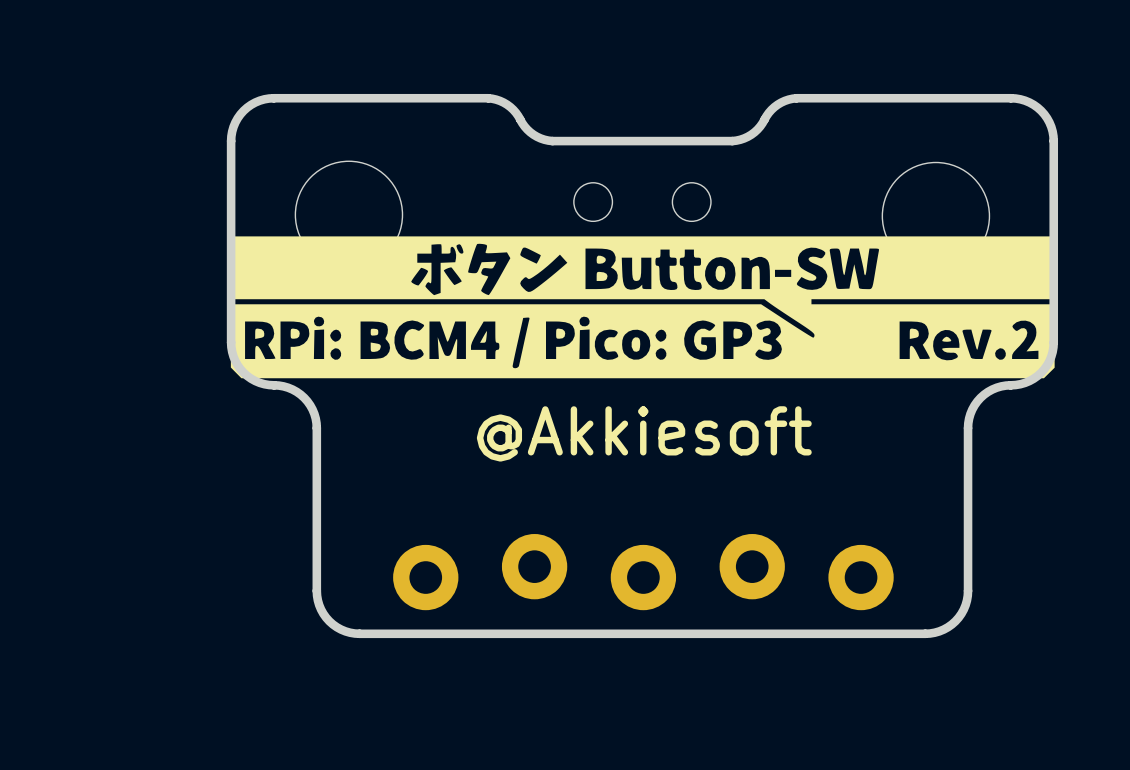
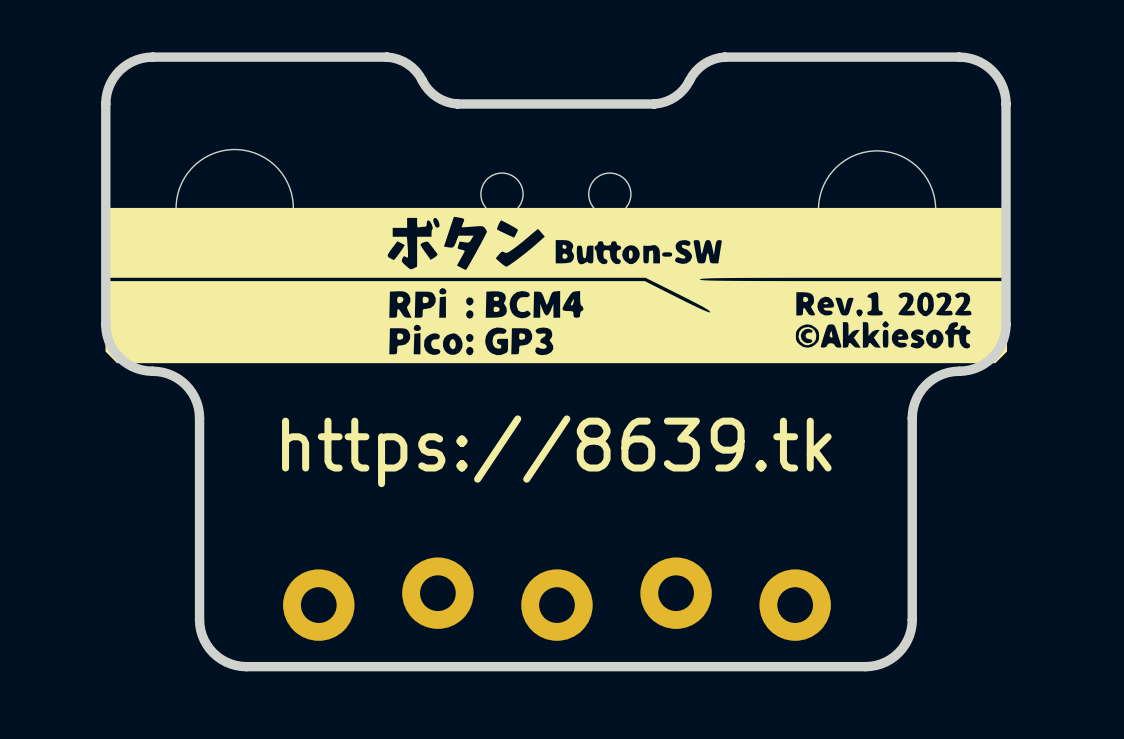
board edge: (1053, 141) (1049, 122) (1041, 110) (1025, 100) (1010, 98) (792, 98) (774, 107) (760, 126) (751, 134) (732, 141) (548, 140) (530, 132) (516, 112) (507, 104) (488, 98) (273, 98) (259, 100) (243, 110) (235, 122) (231, 141) -> (1006, 127) (1005, 98) (998, 79) (992, 70) (979, 61) (959, 57) (719, 57) (699, 67) (683, 89) (675, 96) (654, 104) (451, 103) (432, 93) (416, 71) (407, 64) (387, 57) (147, 57) (127, 64) (112, 79) (106, 98) (105, 127)
drawing shape: [230, 236, 1055, 379] -> [105, 207, 1008, 364]
board edge: (231, 321) (232, 351) (240, 369) (255, 381) (288, 387) (300, 394) (312, 409) (316, 428) -> (105, 324) (110, 344) (123, 361) (137, 368) (173, 375) (189, 388) (198, 407) (199, 441)
board edge: (1053, 321) (1052, 351) (1044, 369) (1029, 381) (996, 387) (984, 394) (972, 409) (968, 428) -> (1006, 324) (1001, 344) (988, 361) (974, 368) (938, 375) (922, 388) (913, 407) (912, 441)
text: @Akkiesoft (644, 433) -> https://8639.tk (556, 451)

